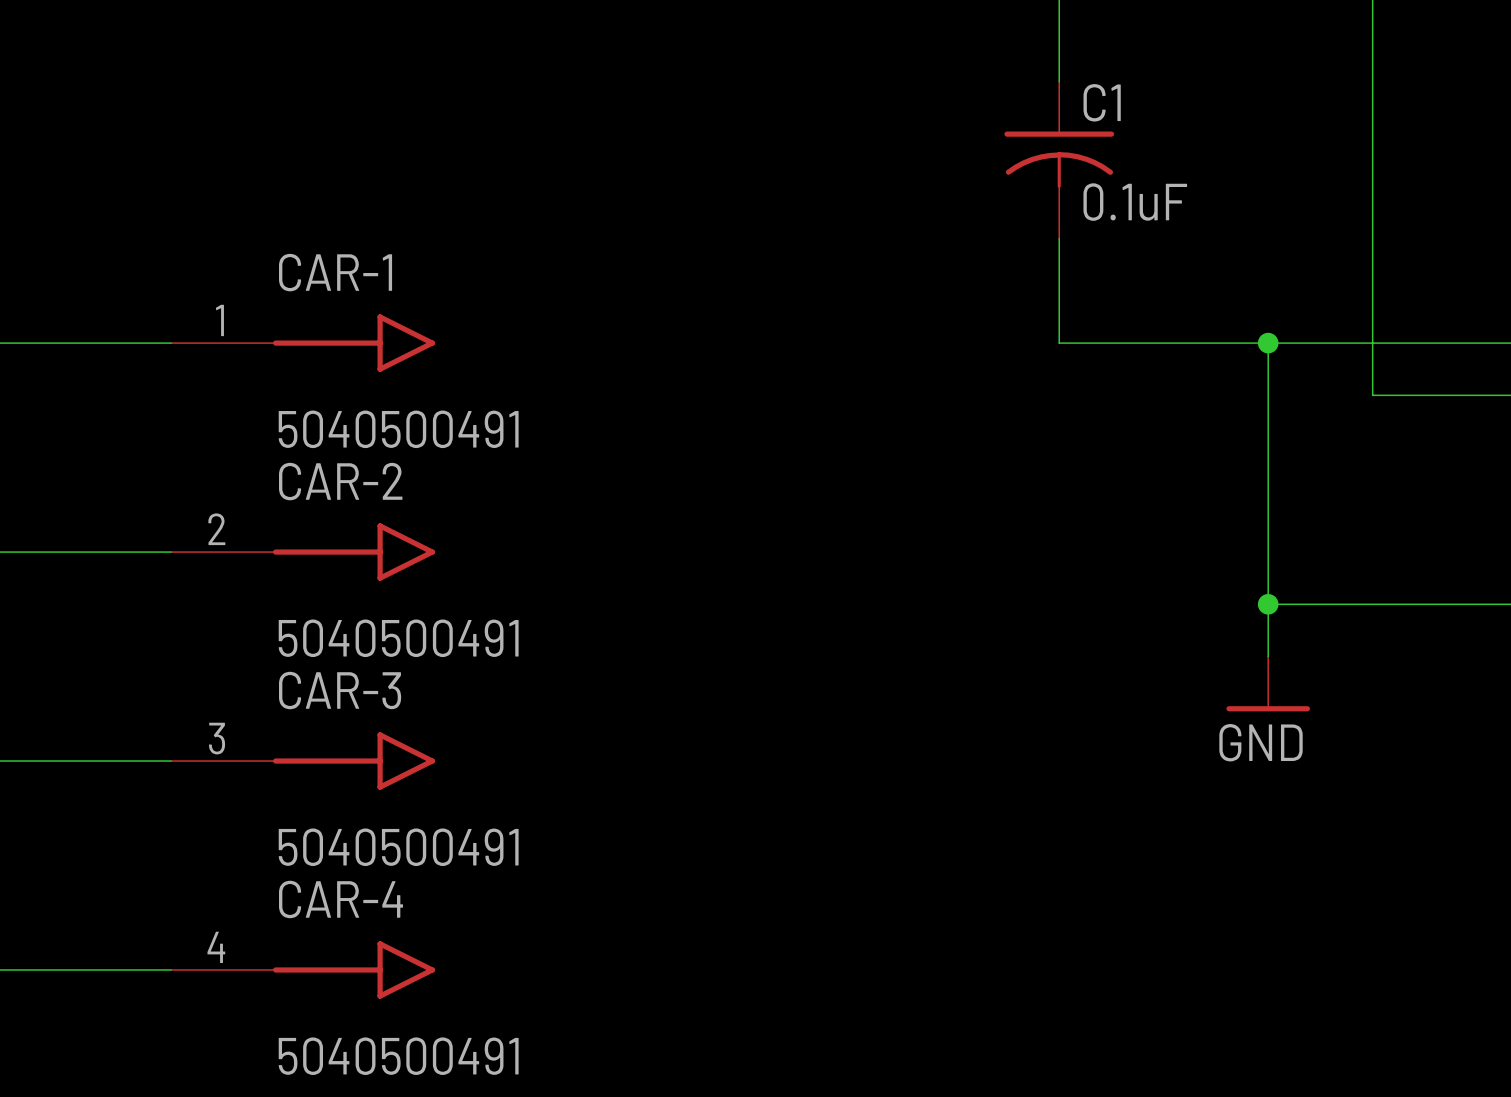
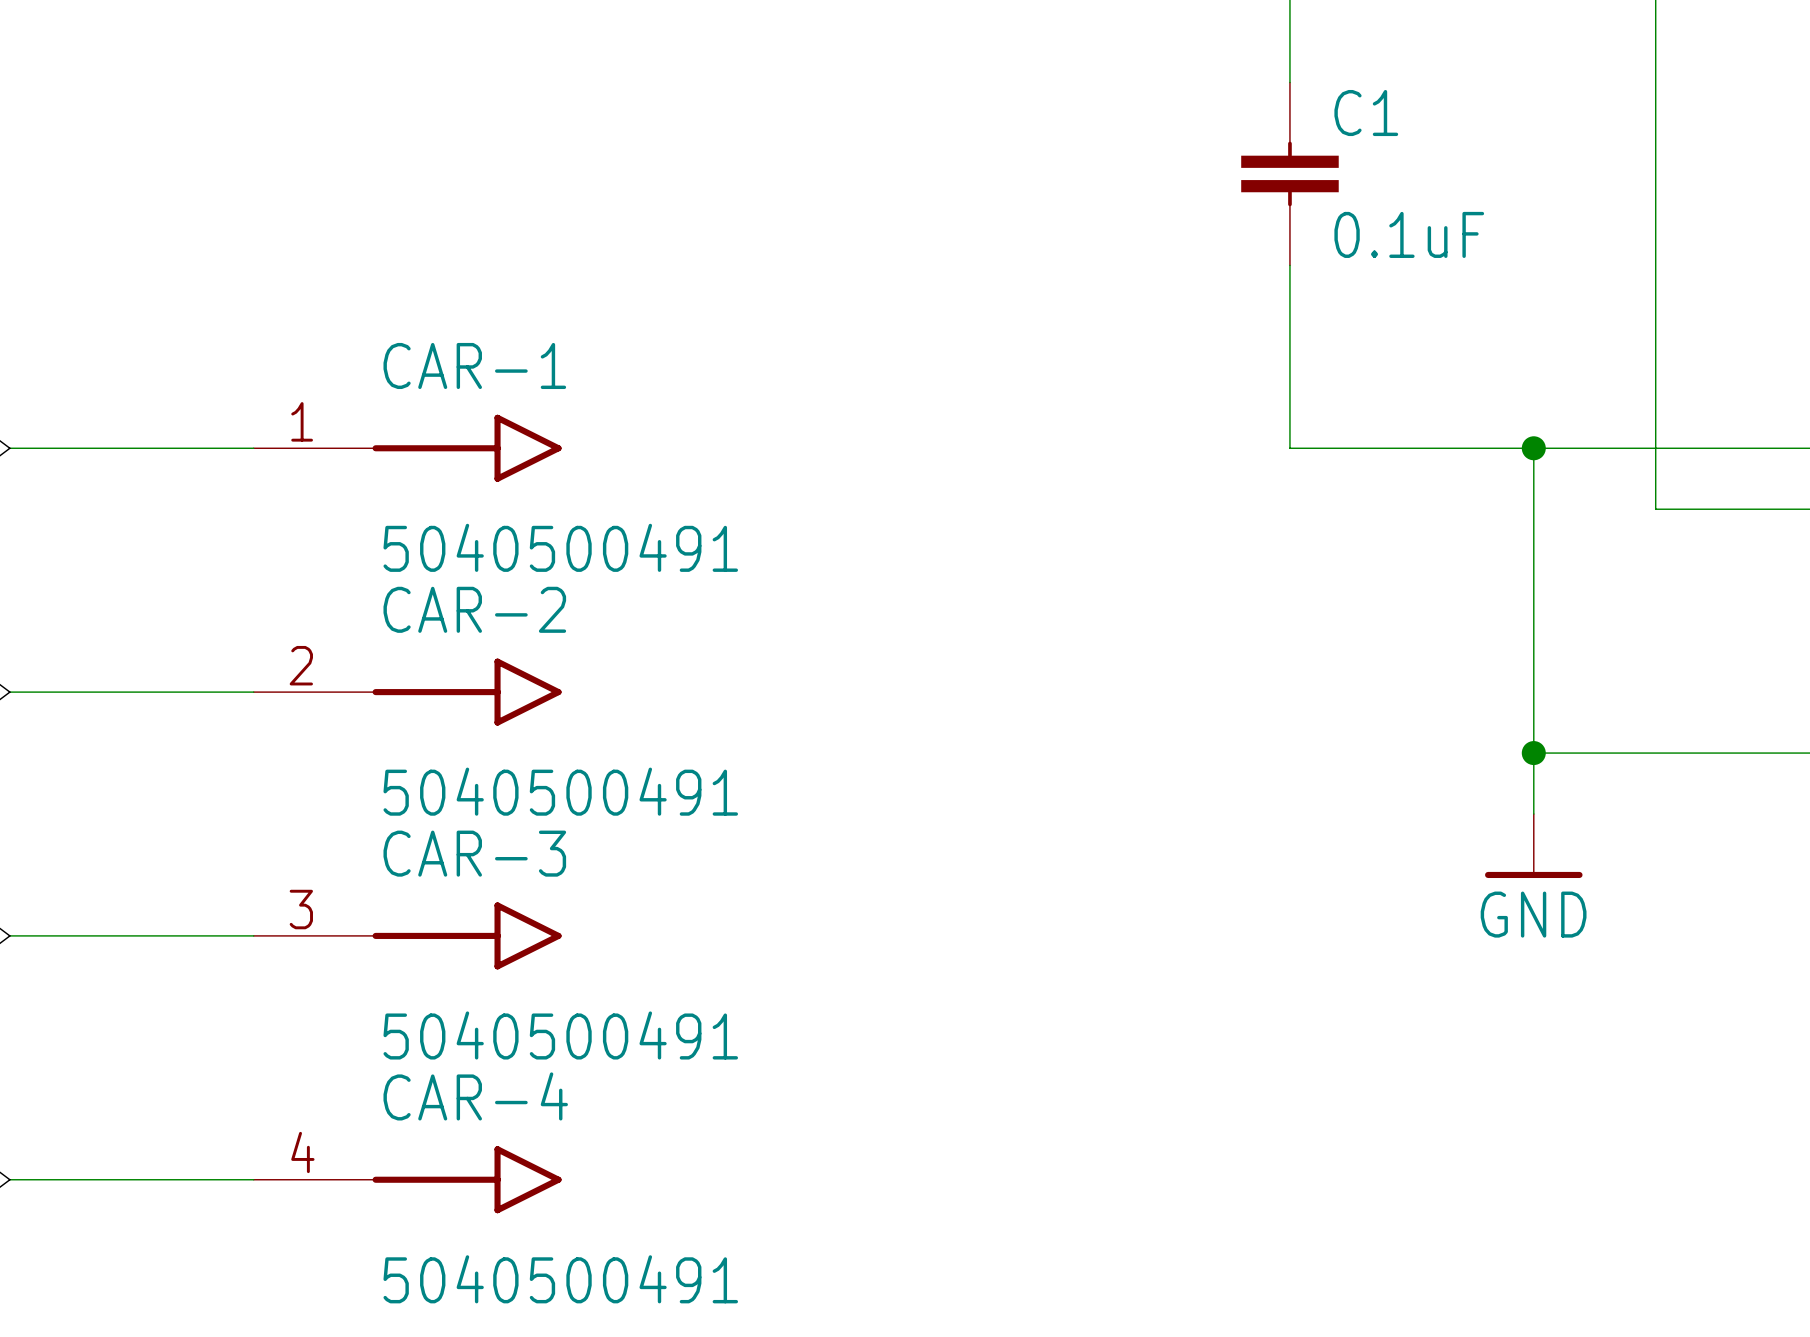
C1 symbol: [1004, 81, 1115, 239] -> [1241, 82, 1339, 266]

